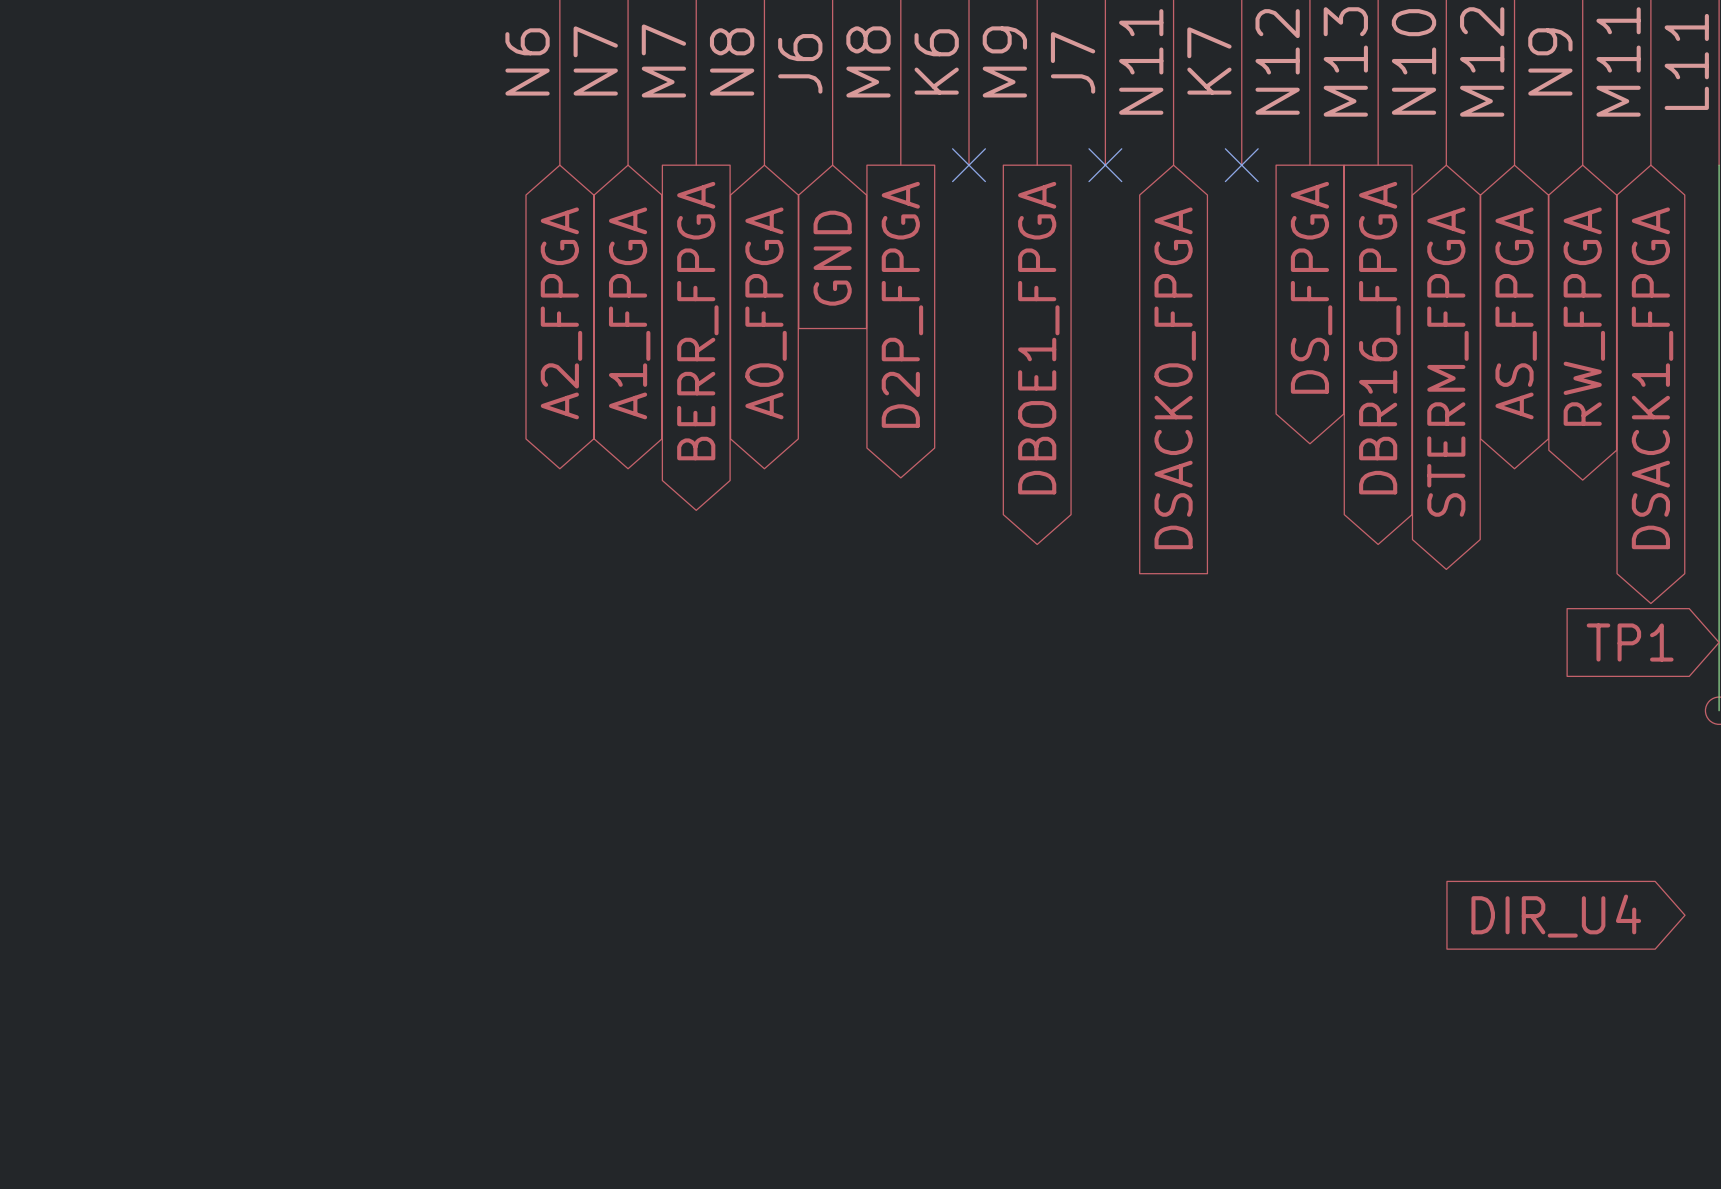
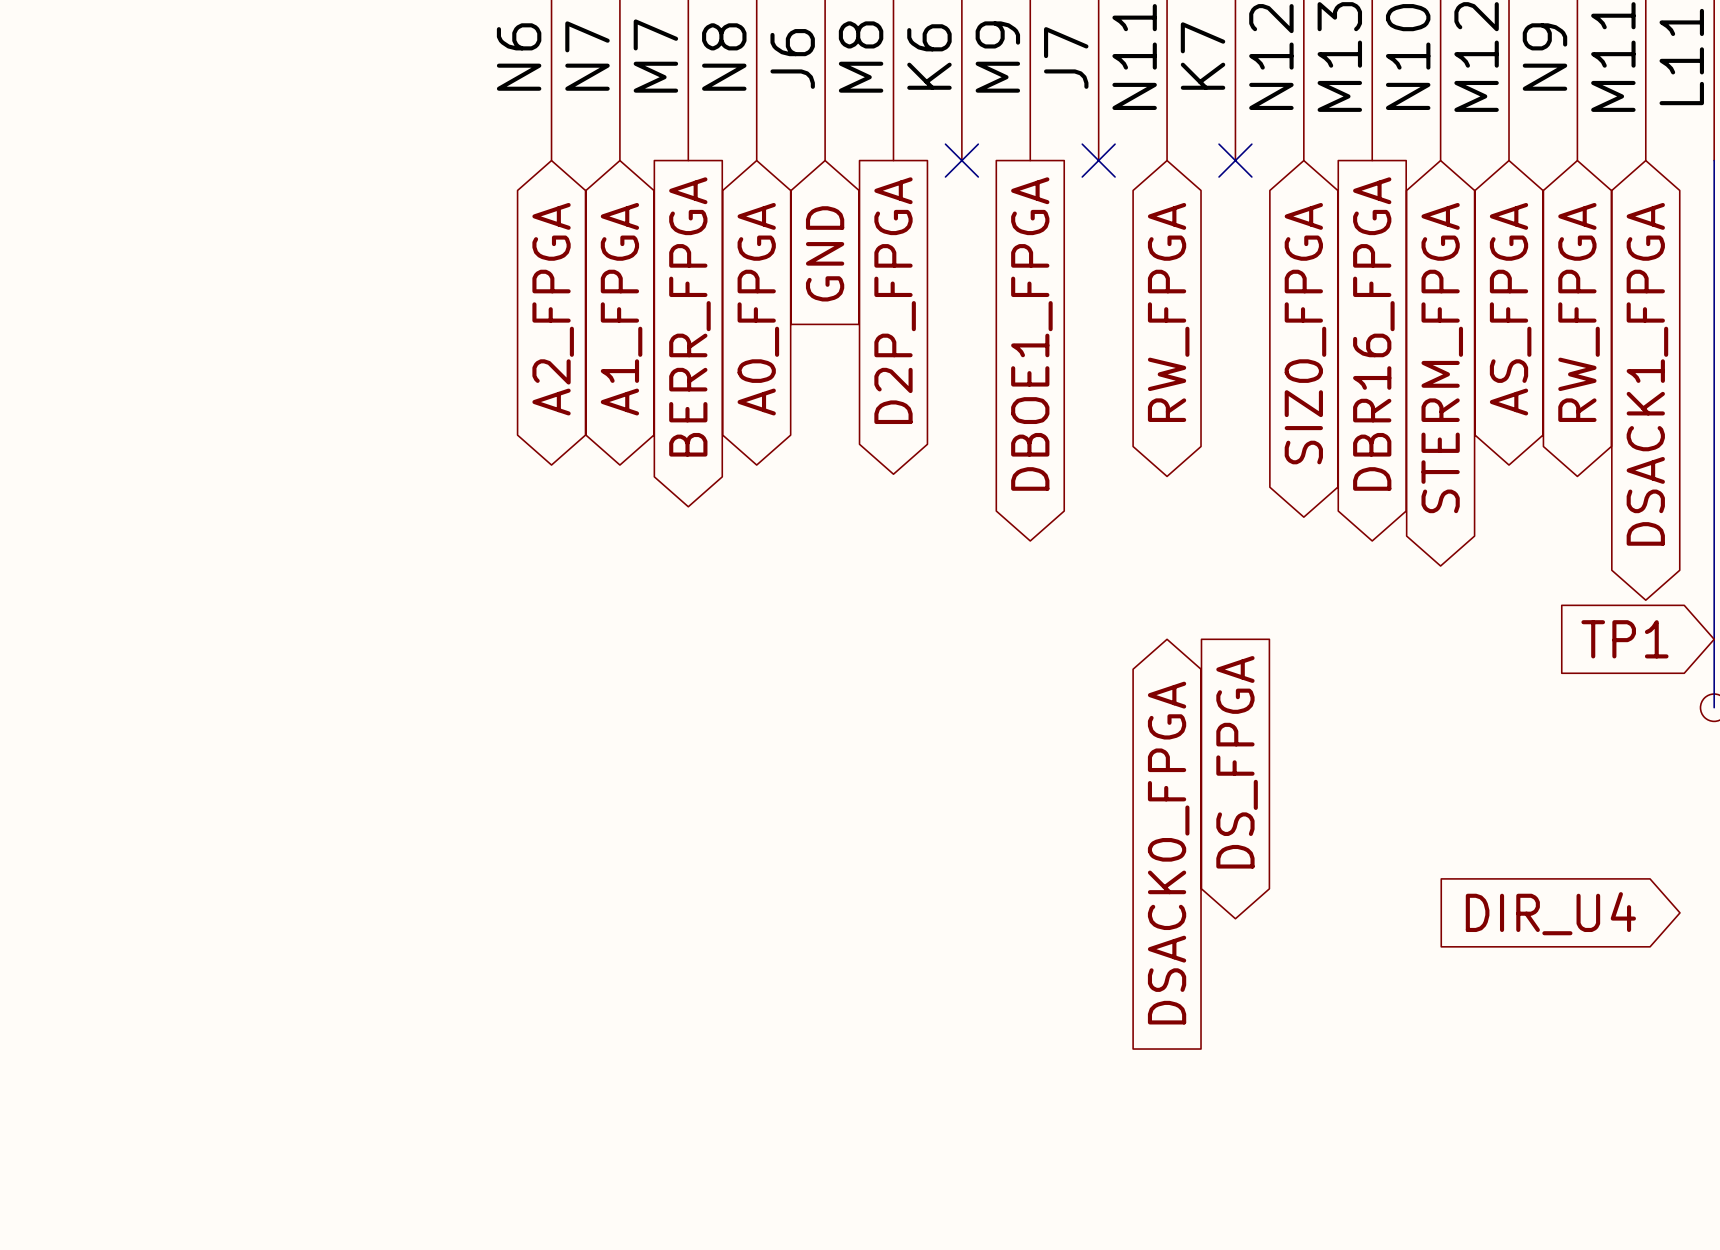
global label shape: output (1311, 287) -> bidirectional (1305, 333)
global label: DS_FPGA (1311, 287) -> SIZ0_FPGA (1305, 333)
global label shape: input (1175, 378) -> bidirectional (1168, 312)
global label: DSACK0_FPGA (1175, 378) -> RW_FPGA (1168, 312)
global label: none -> DS_FPGA (1237, 762)
global label: none -> DSACK0_FPGA (1168, 853)

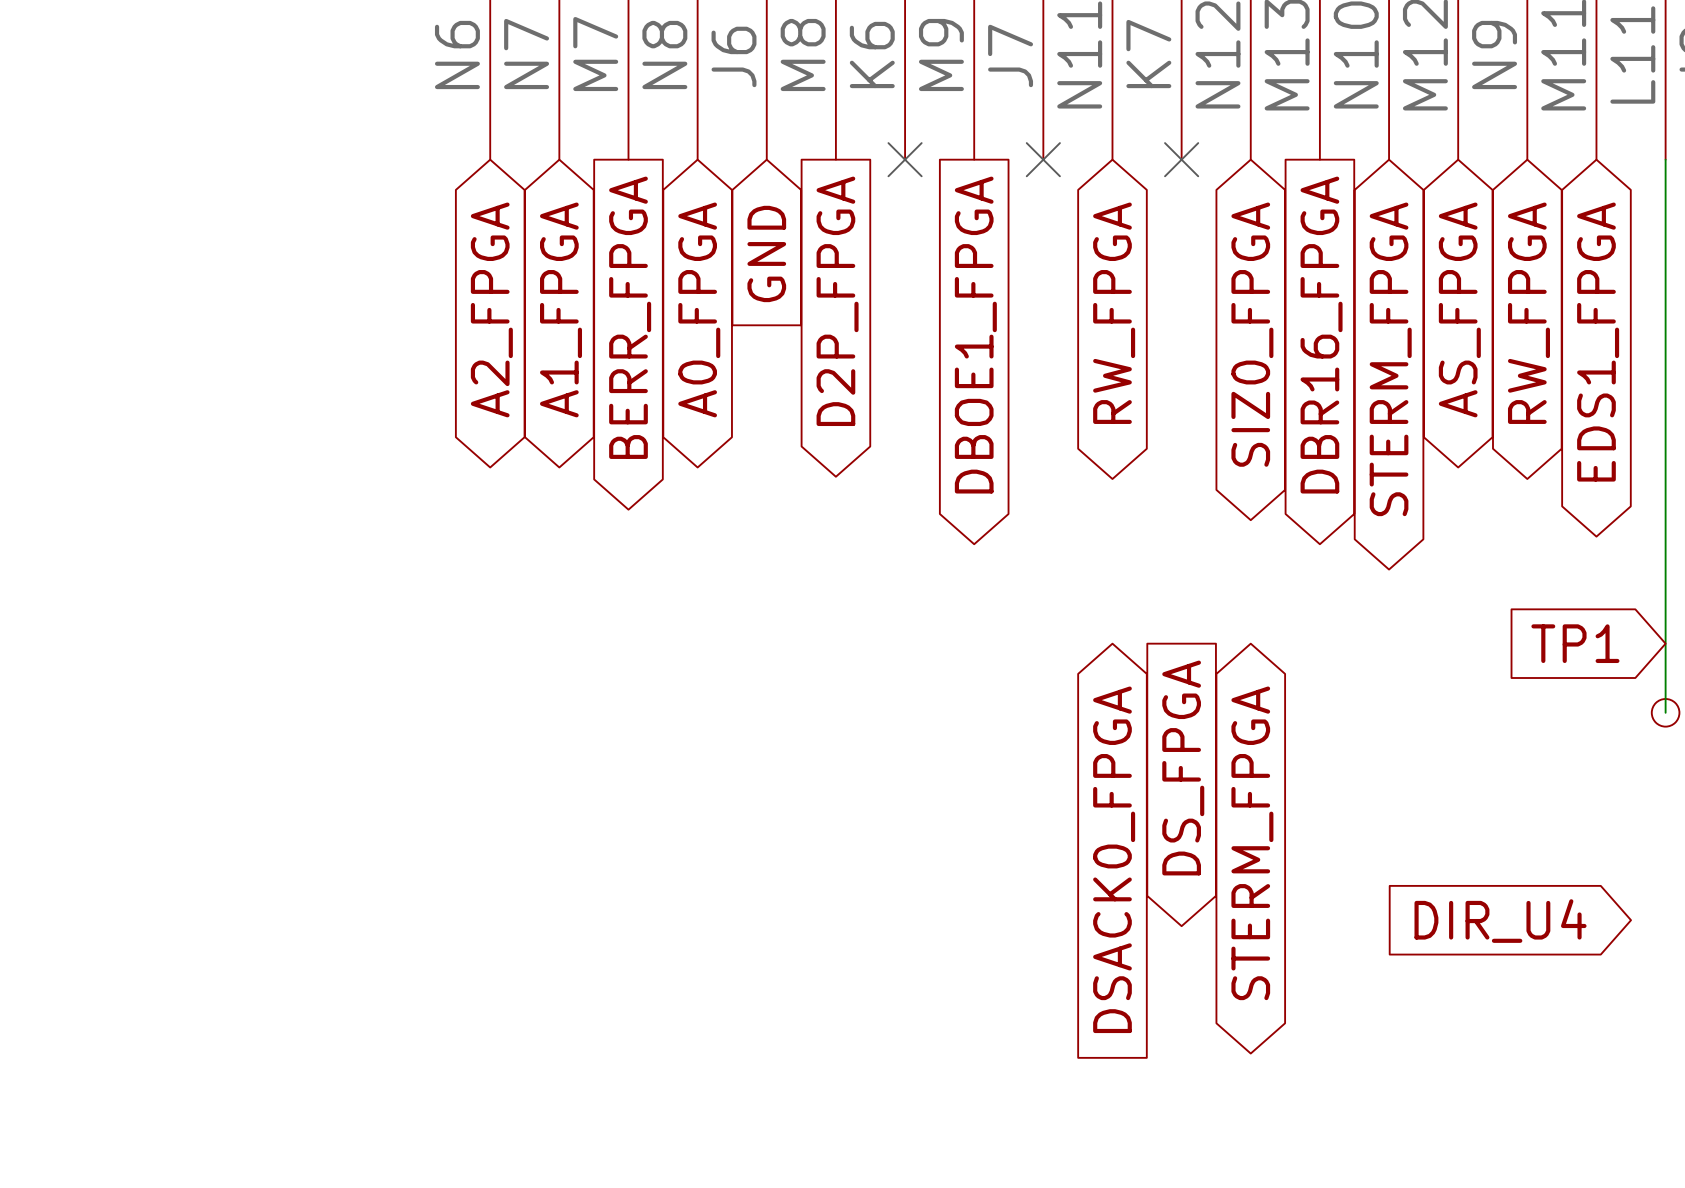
global label: DSACK1_FPGA (1647, 374) -> EDS1_FPGA (1598, 342)
global label: none -> STERM_FPGA (1252, 843)

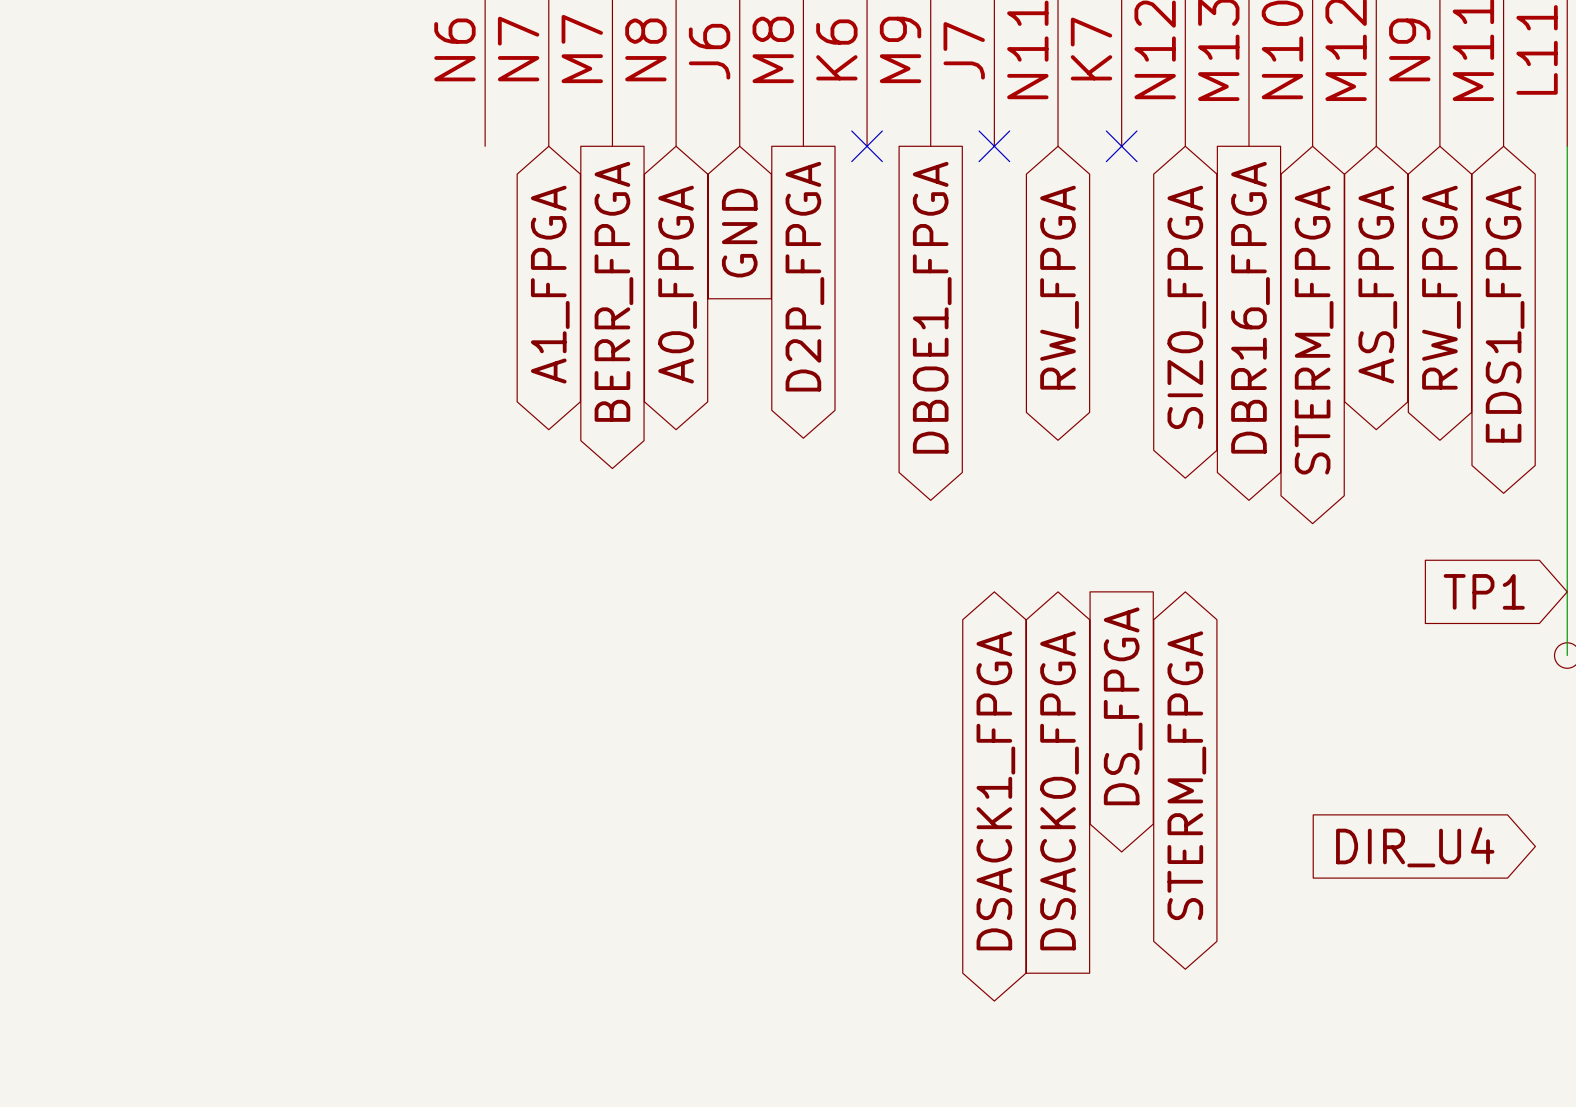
global label: A2_FPGA (491, 309) -> none
global label: none -> DSACK1_FPGA (995, 790)

